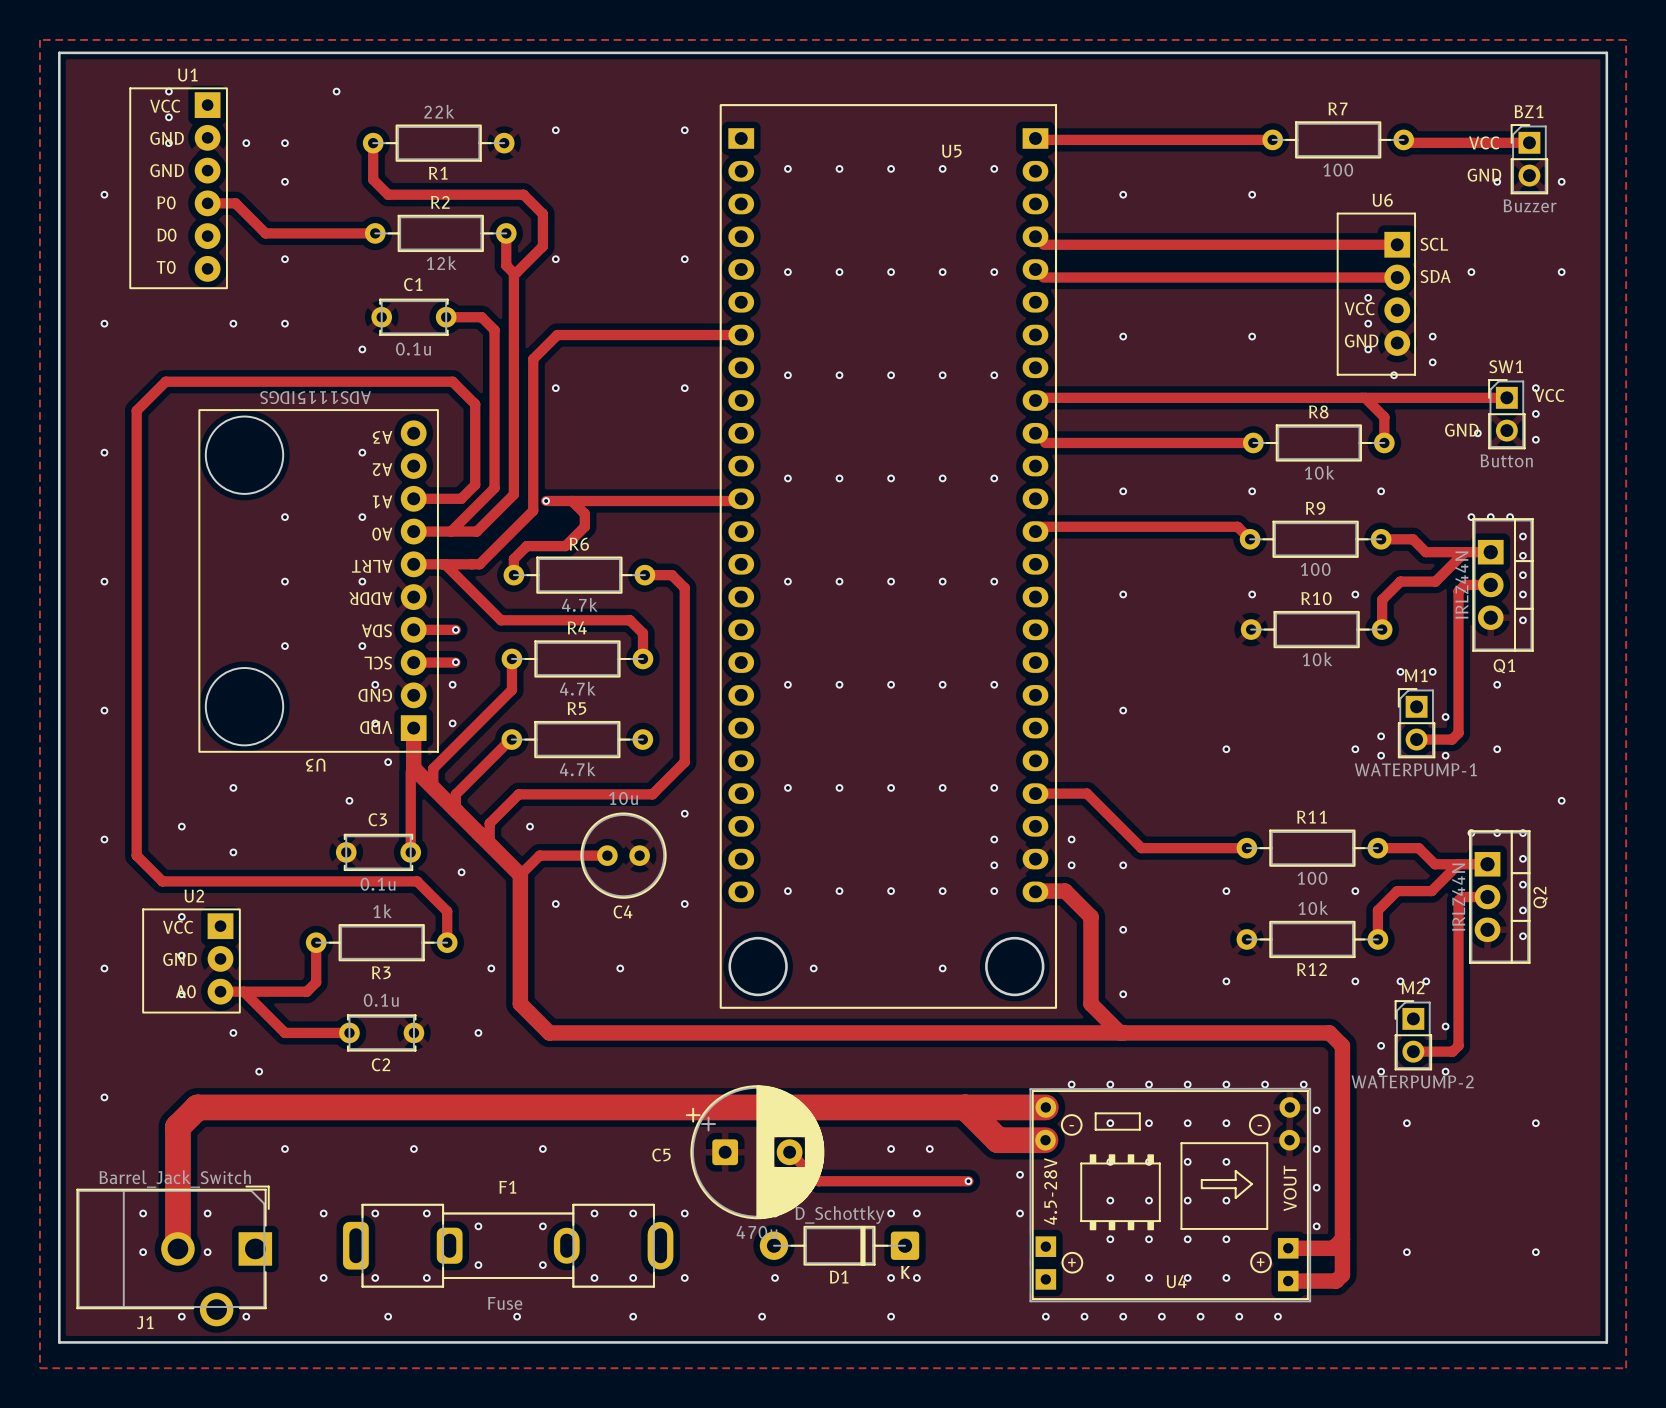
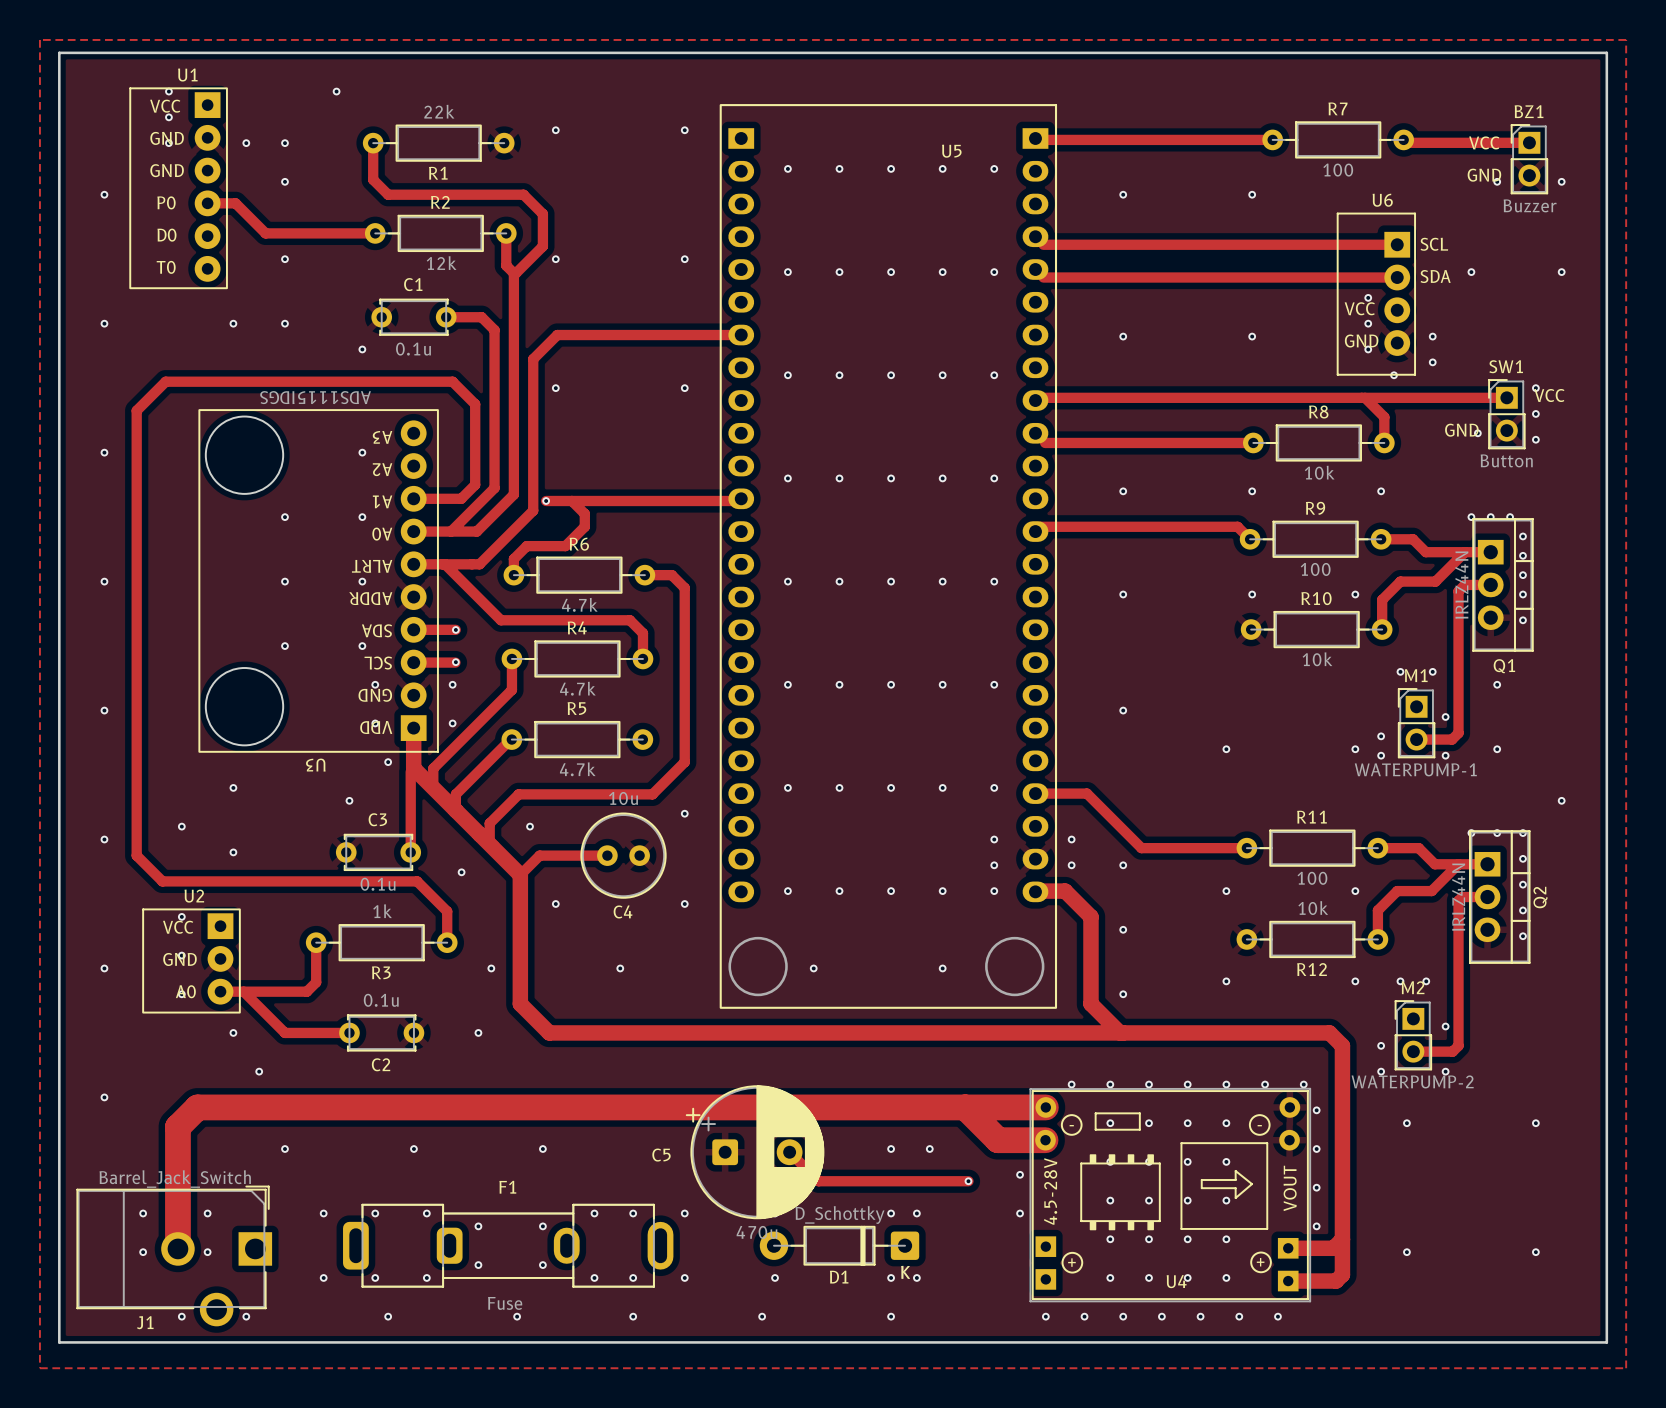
U5 footprint: [719, 104, 1058, 1009] -> [719, 104, 1058, 1009]

